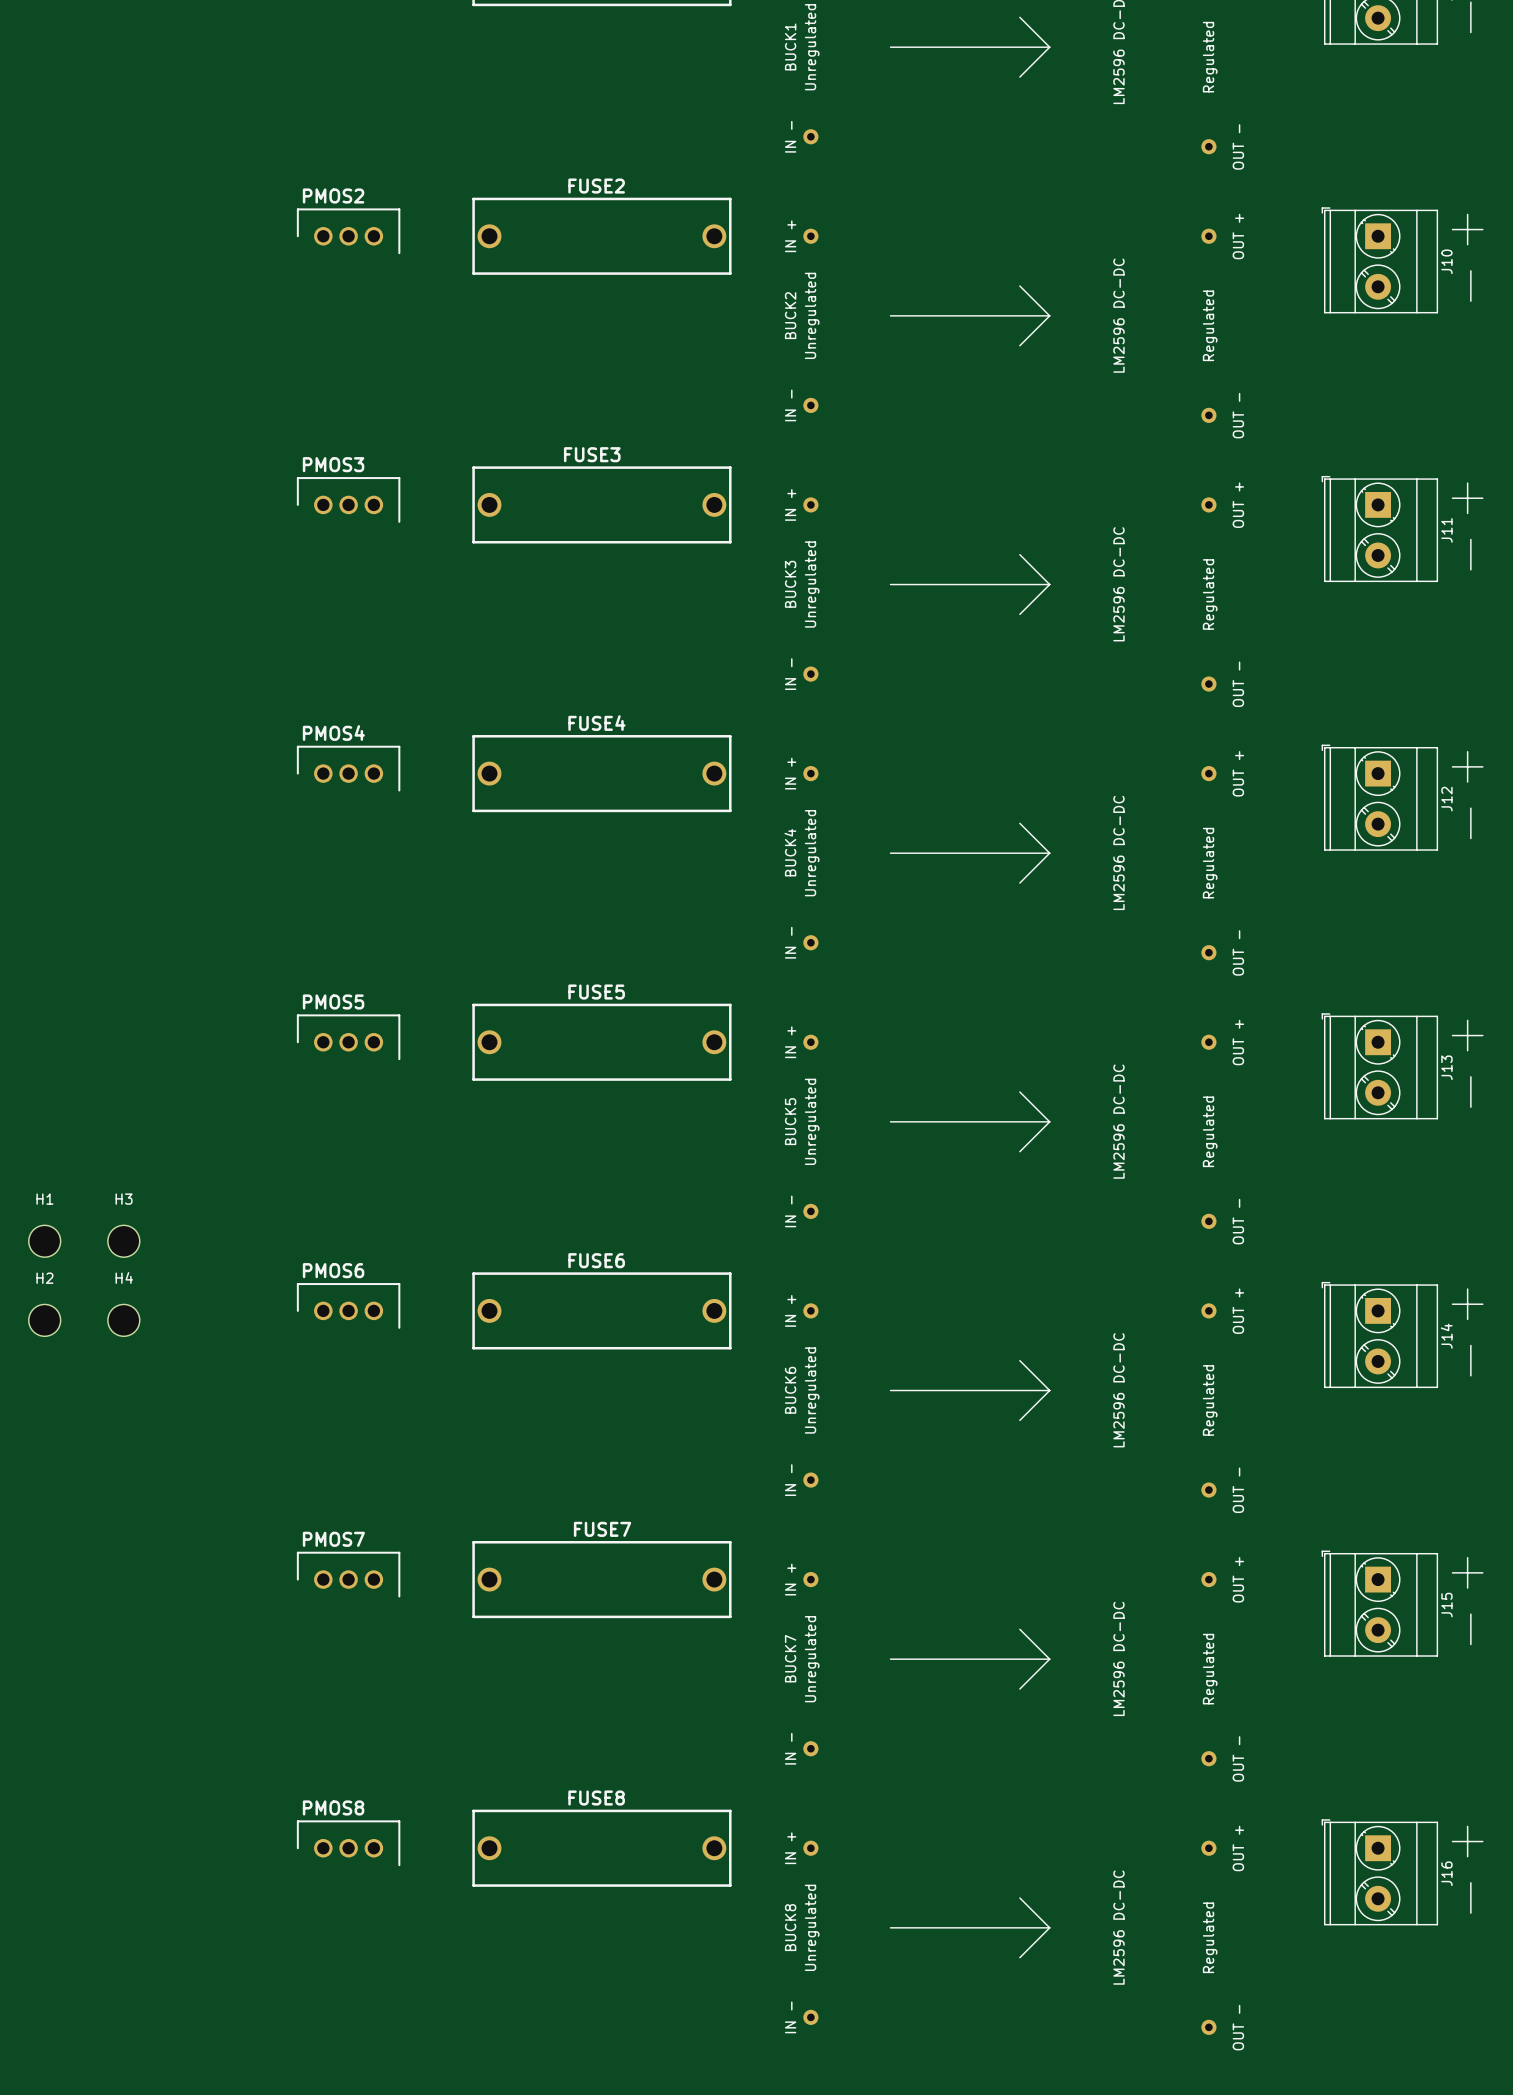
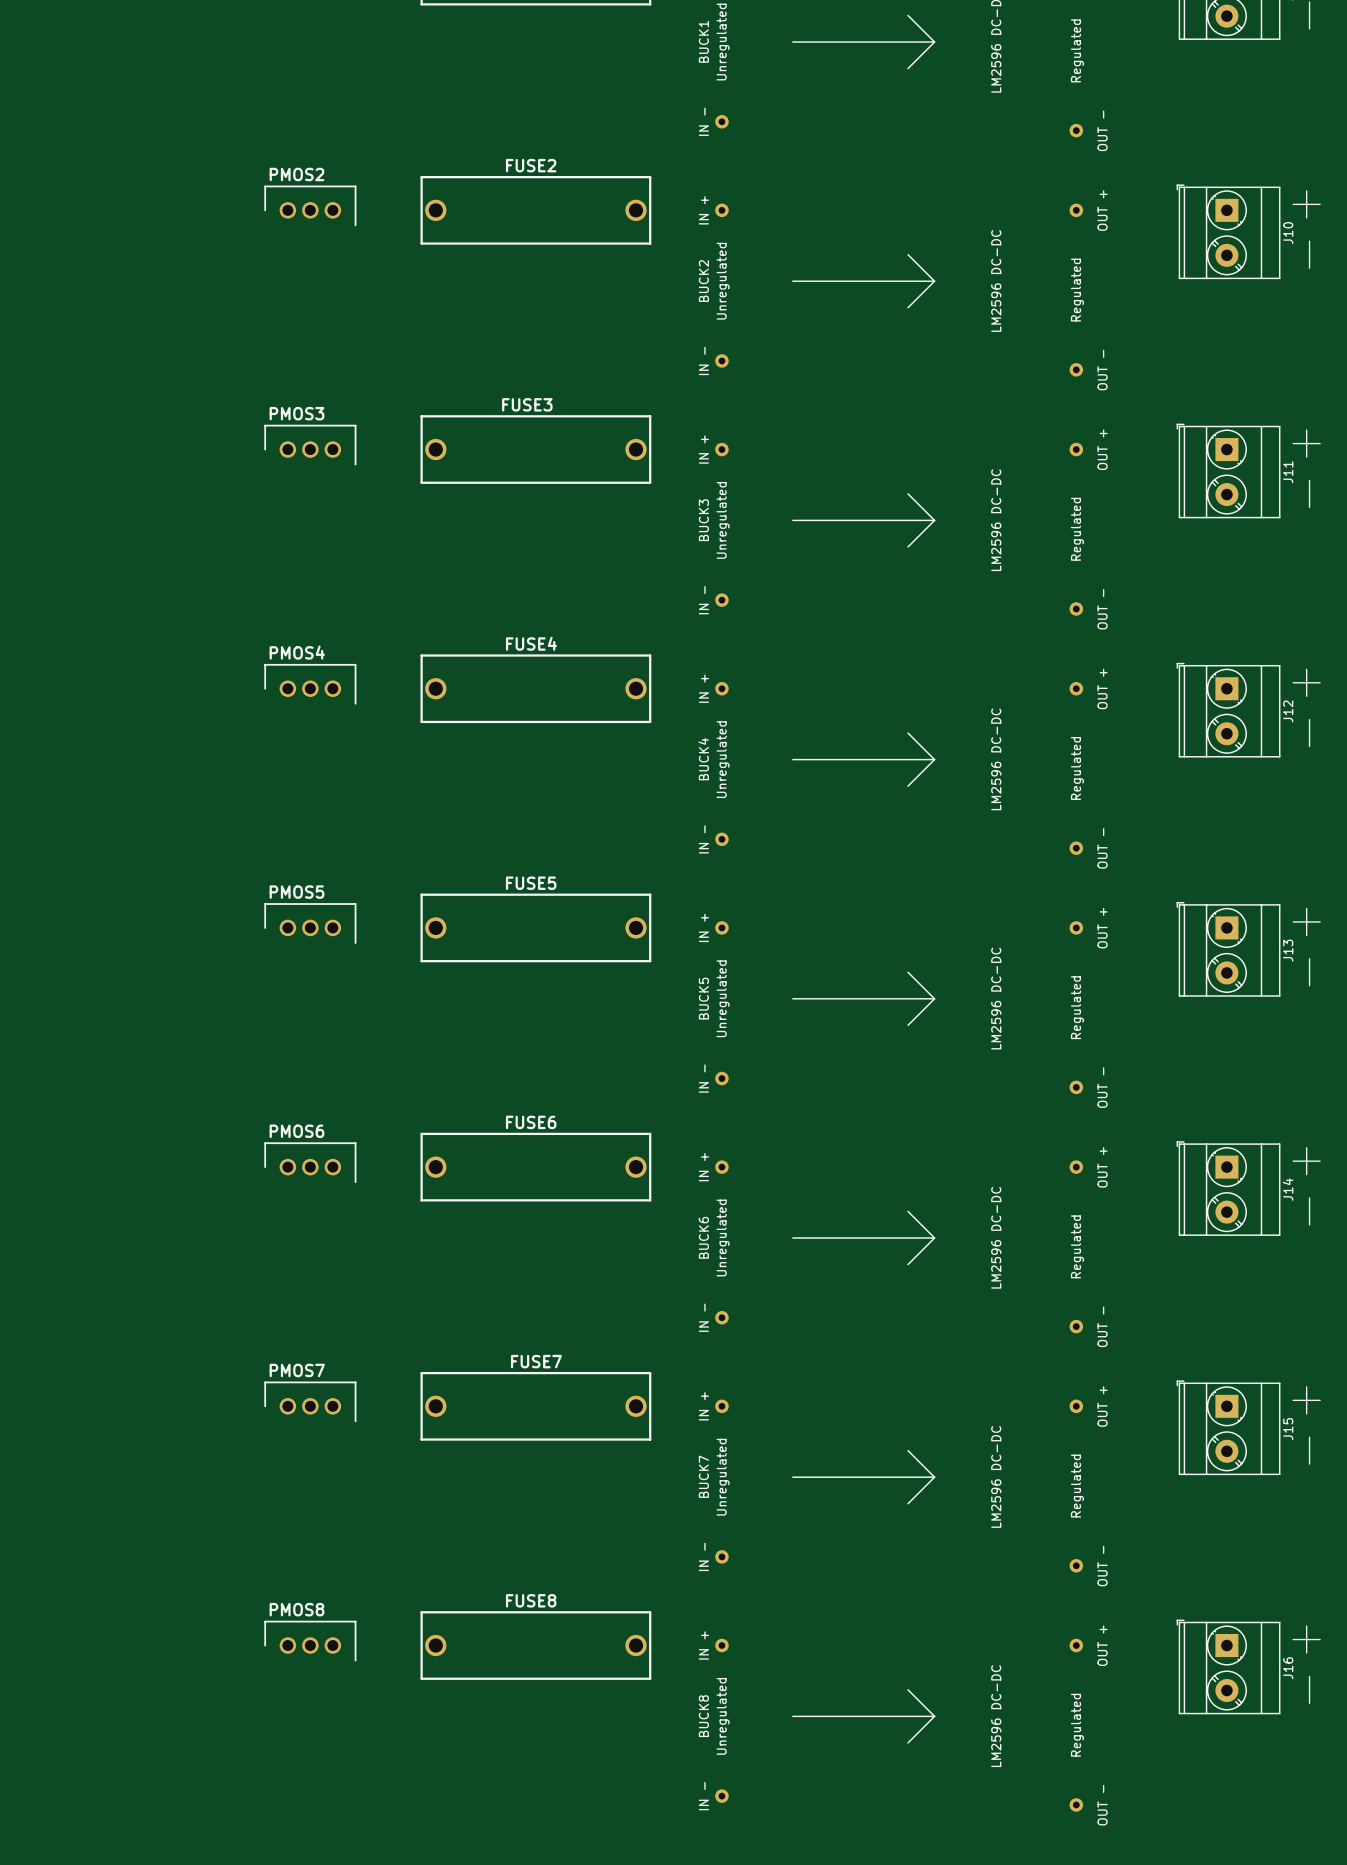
H1: (44, 1241) -> none
H3: (123, 1241) -> none
H2: (44, 1320) -> none
H4: (123, 1320) -> none

